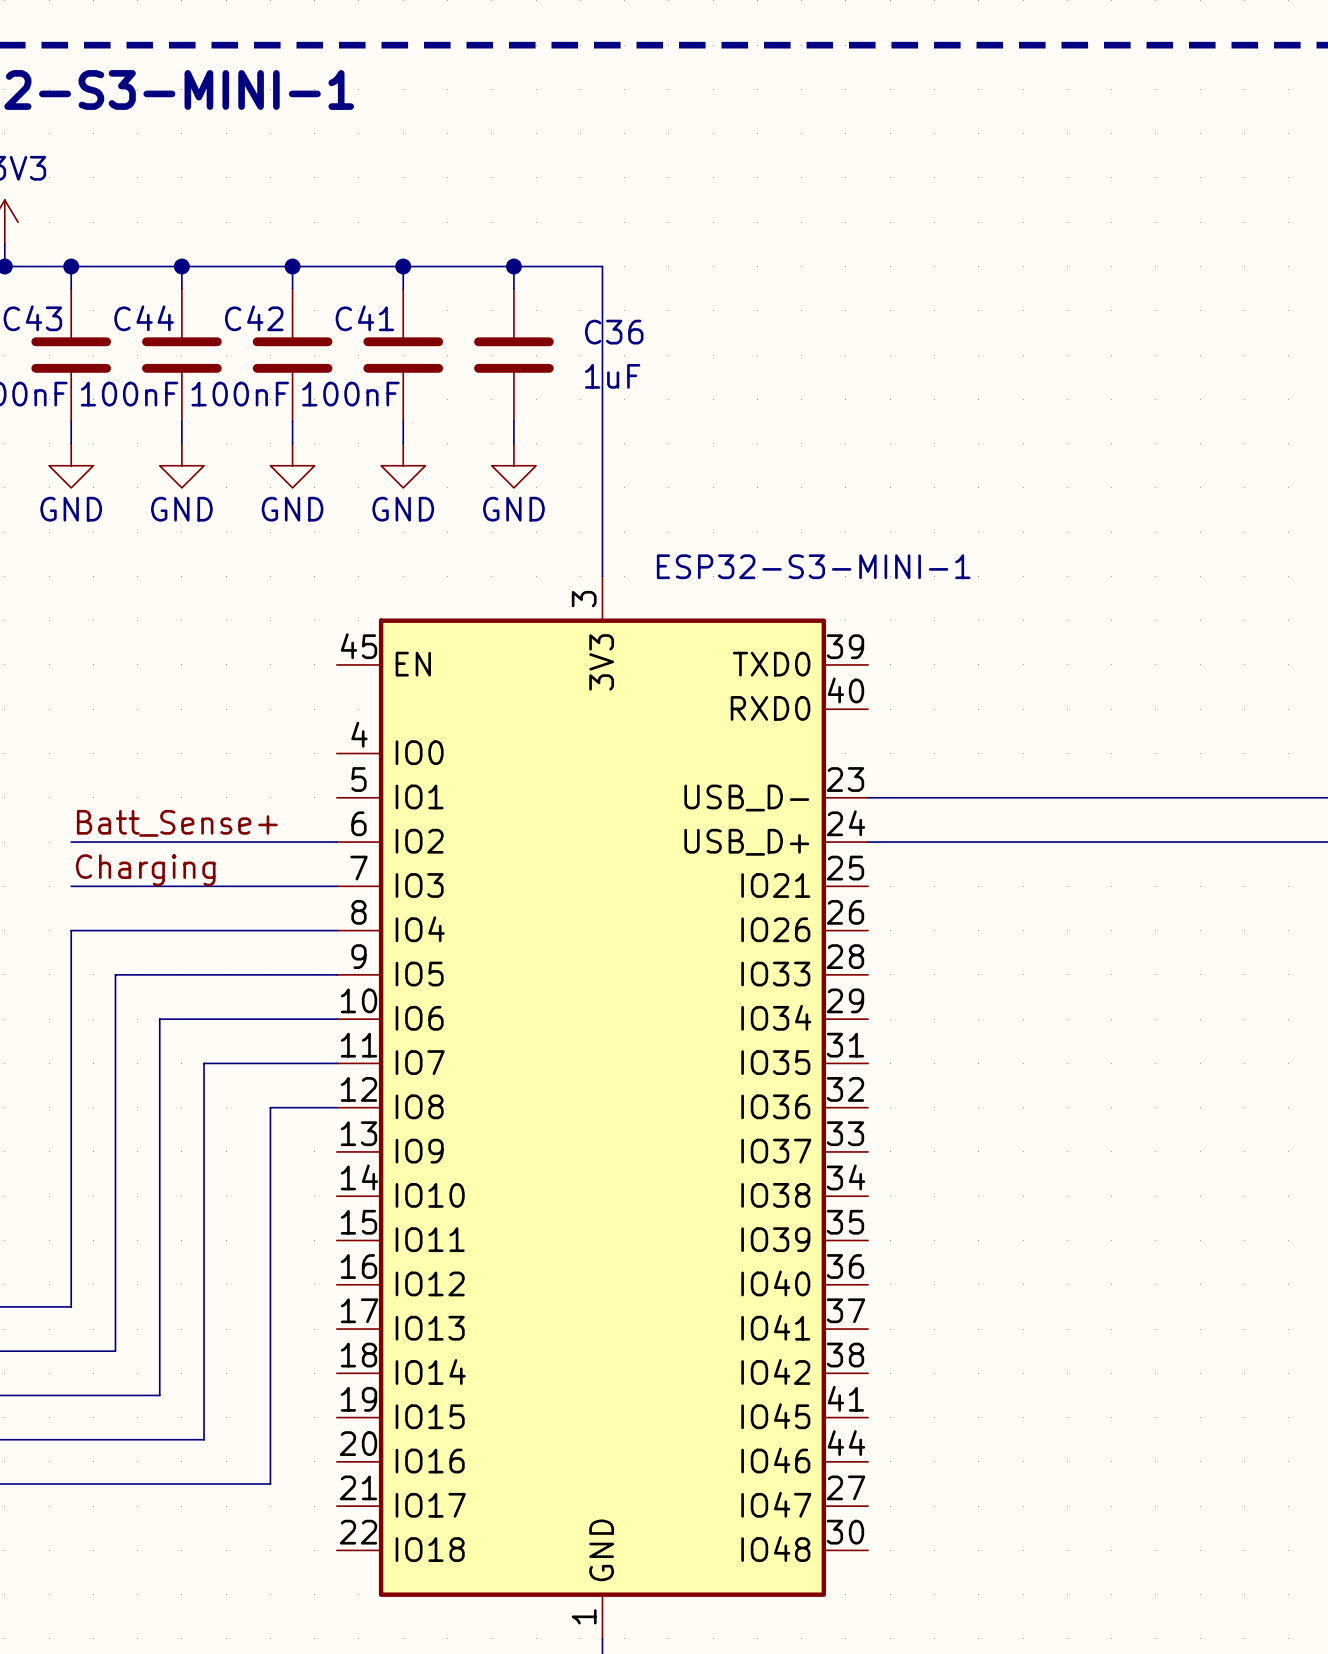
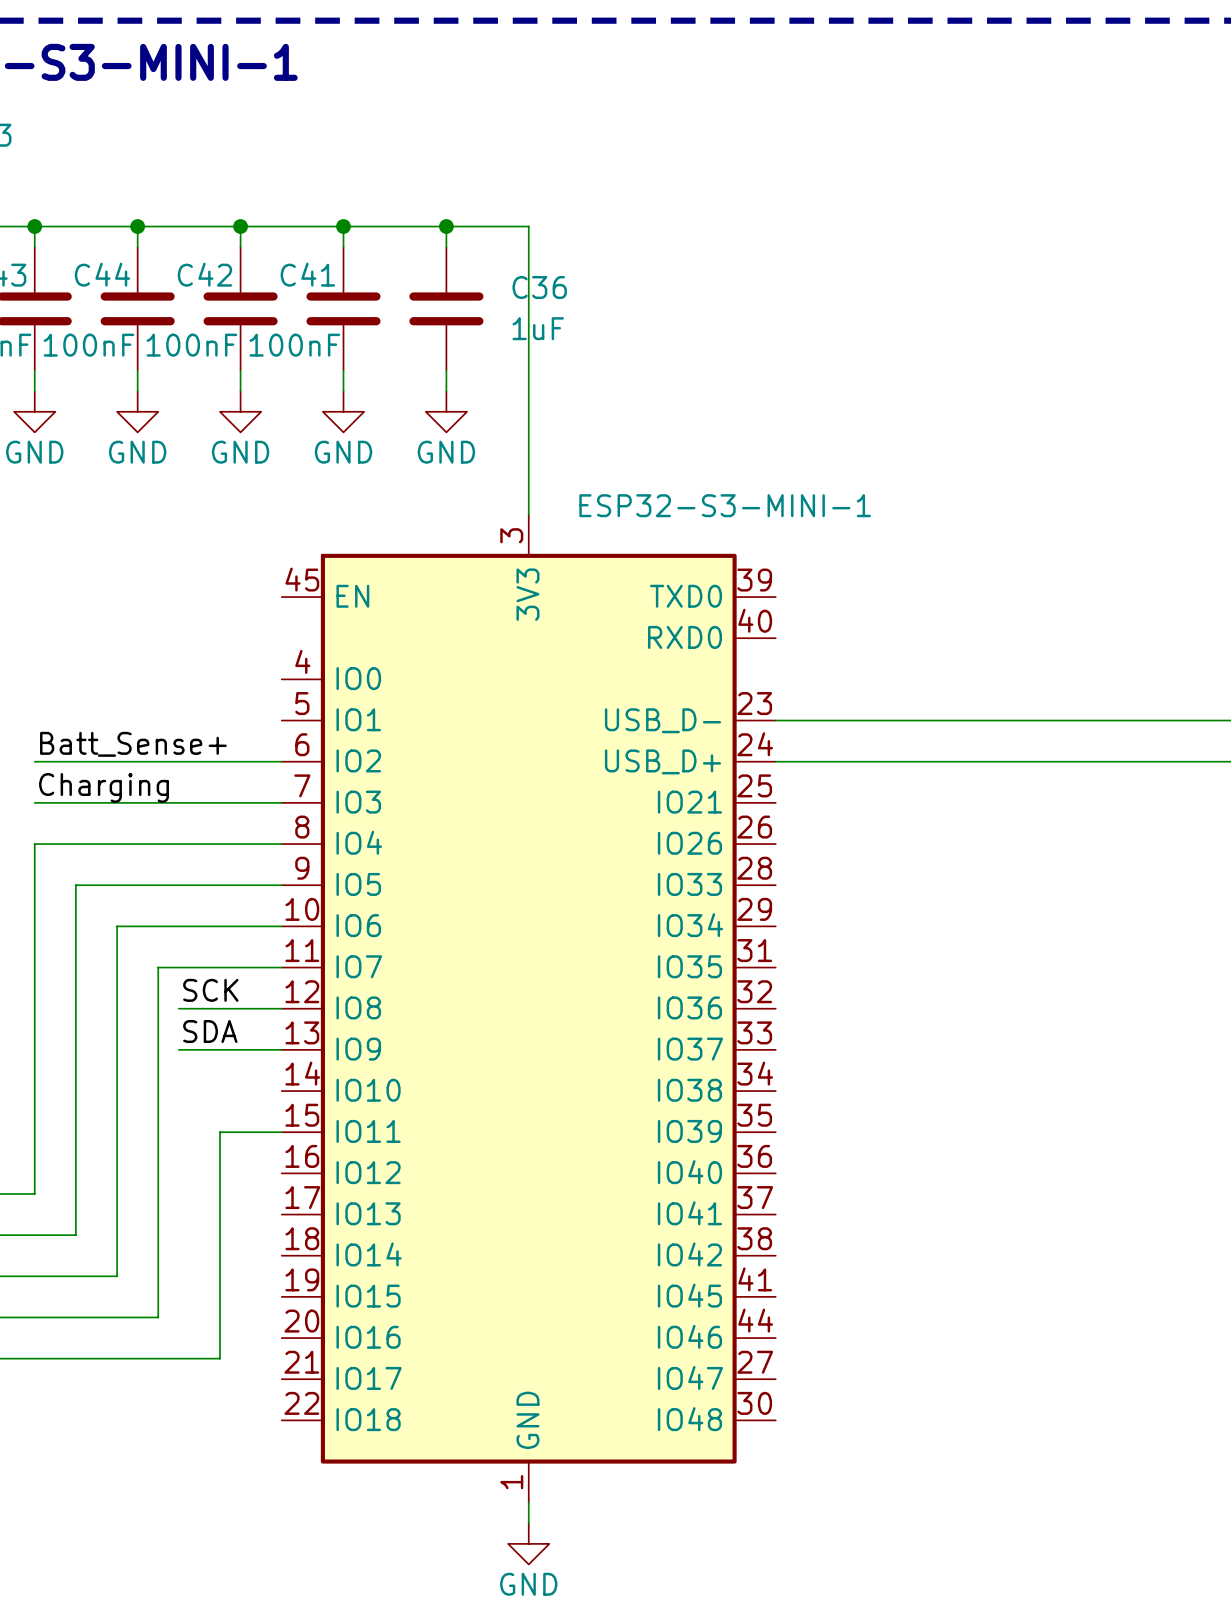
label: none -> SCK (210, 990)
wire: (270, 1107) (270, 1240) -> (219, 1008) (178, 1008)
label: none -> SDA (210, 1031)
wire: none -> (178, 1049) (281, 1049)
wire: none -> (219, 1132) (281, 1132)

